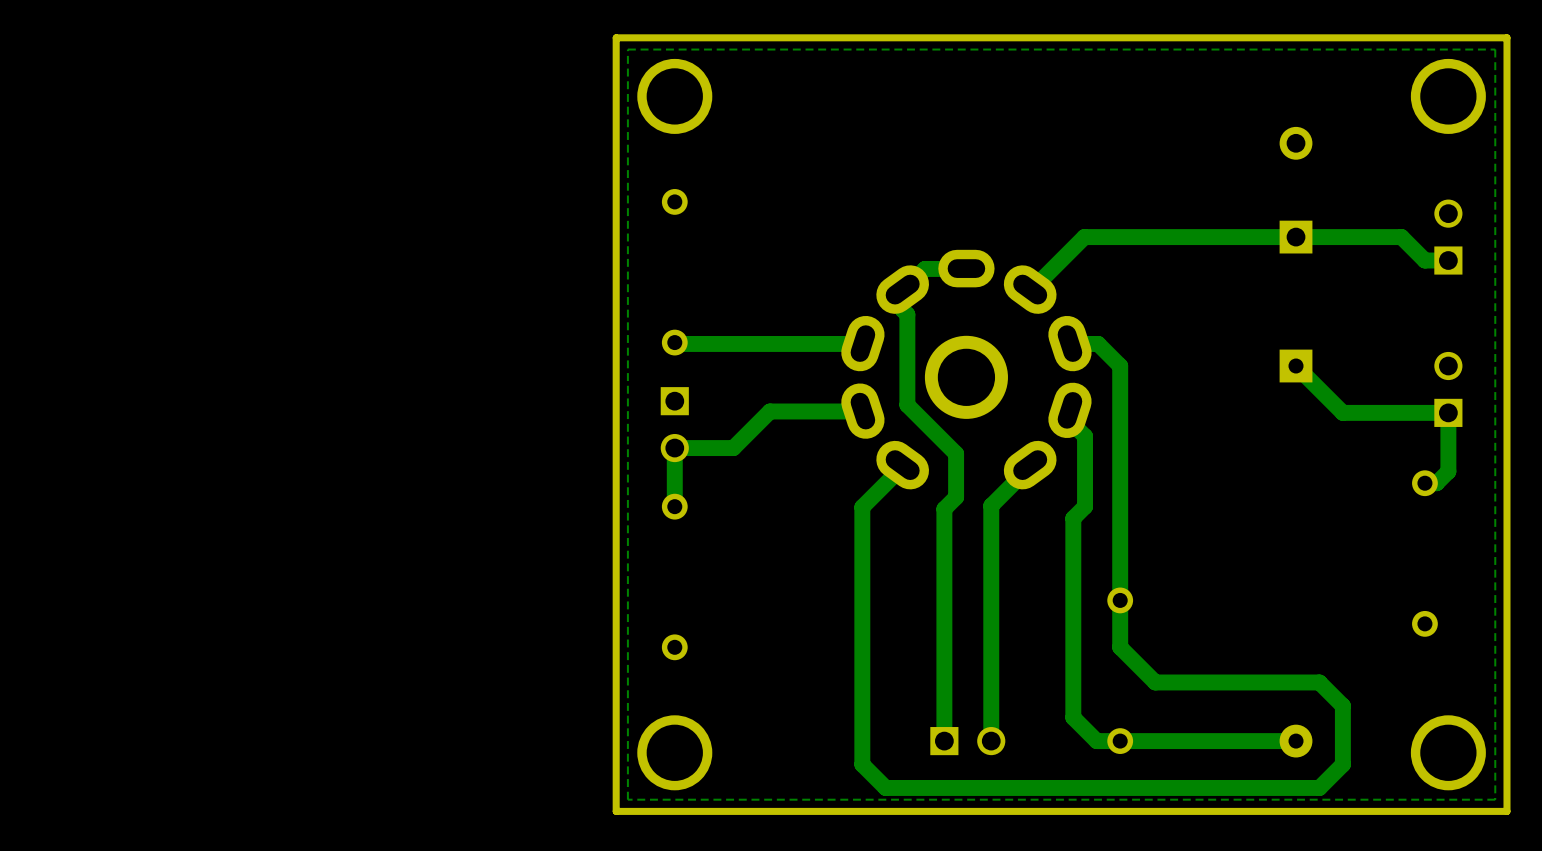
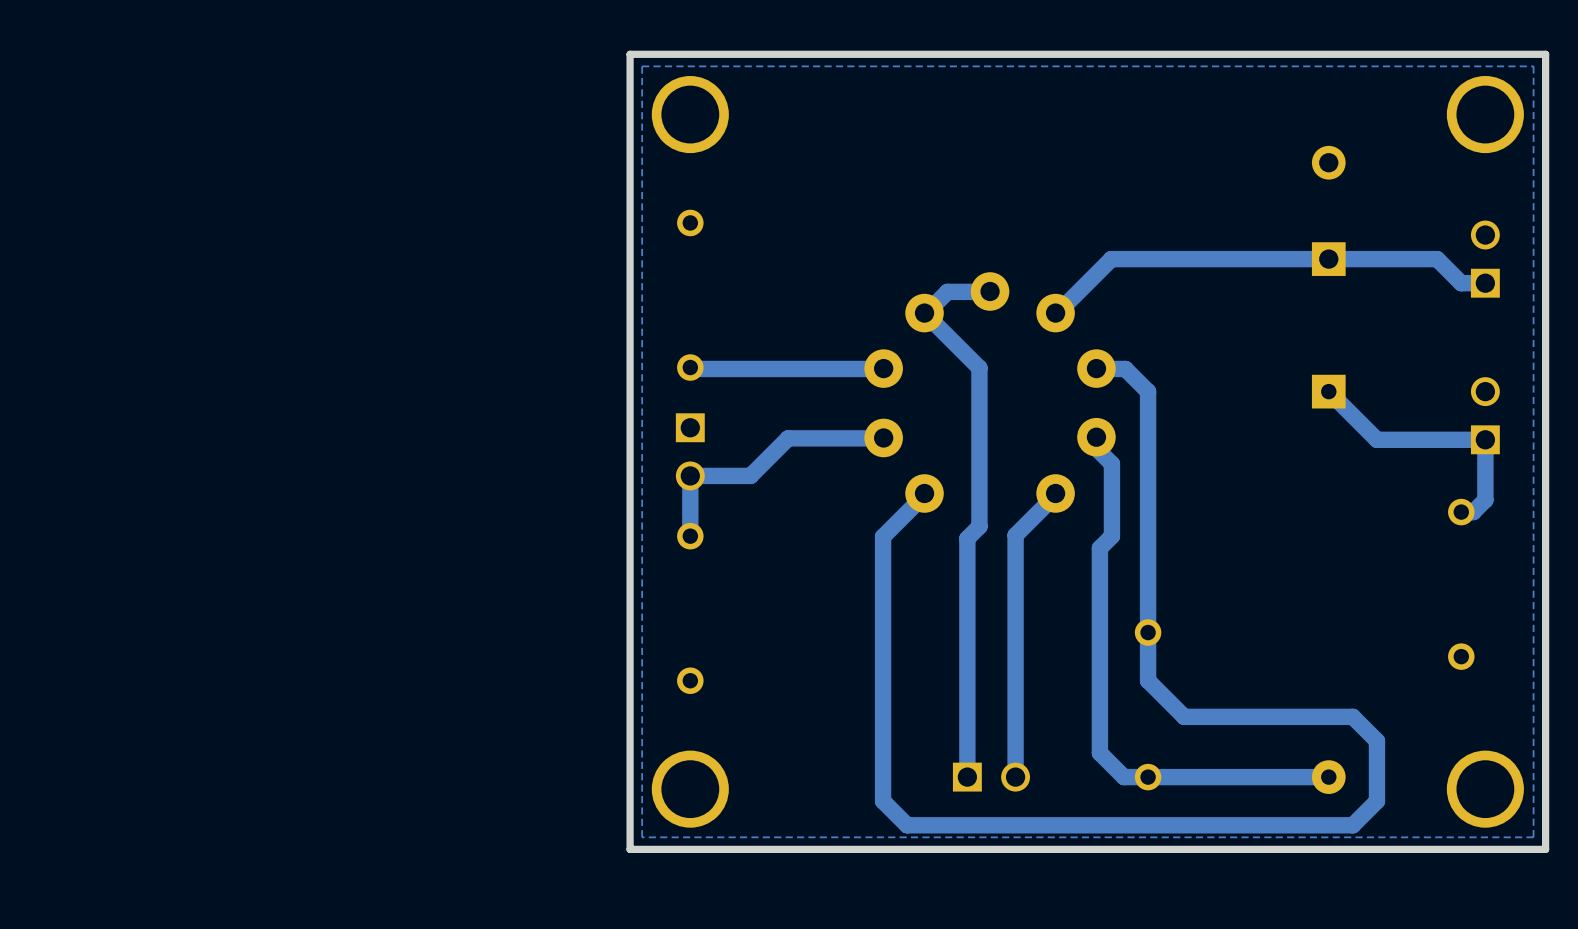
part footprint: [841, 249, 1092, 490] -> [864, 272, 1116, 513]
bottom track: (902, 289) (902, 309) (907, 314) (907, 405) (956, 453) -> (924, 313) (979, 367) (979, 481)

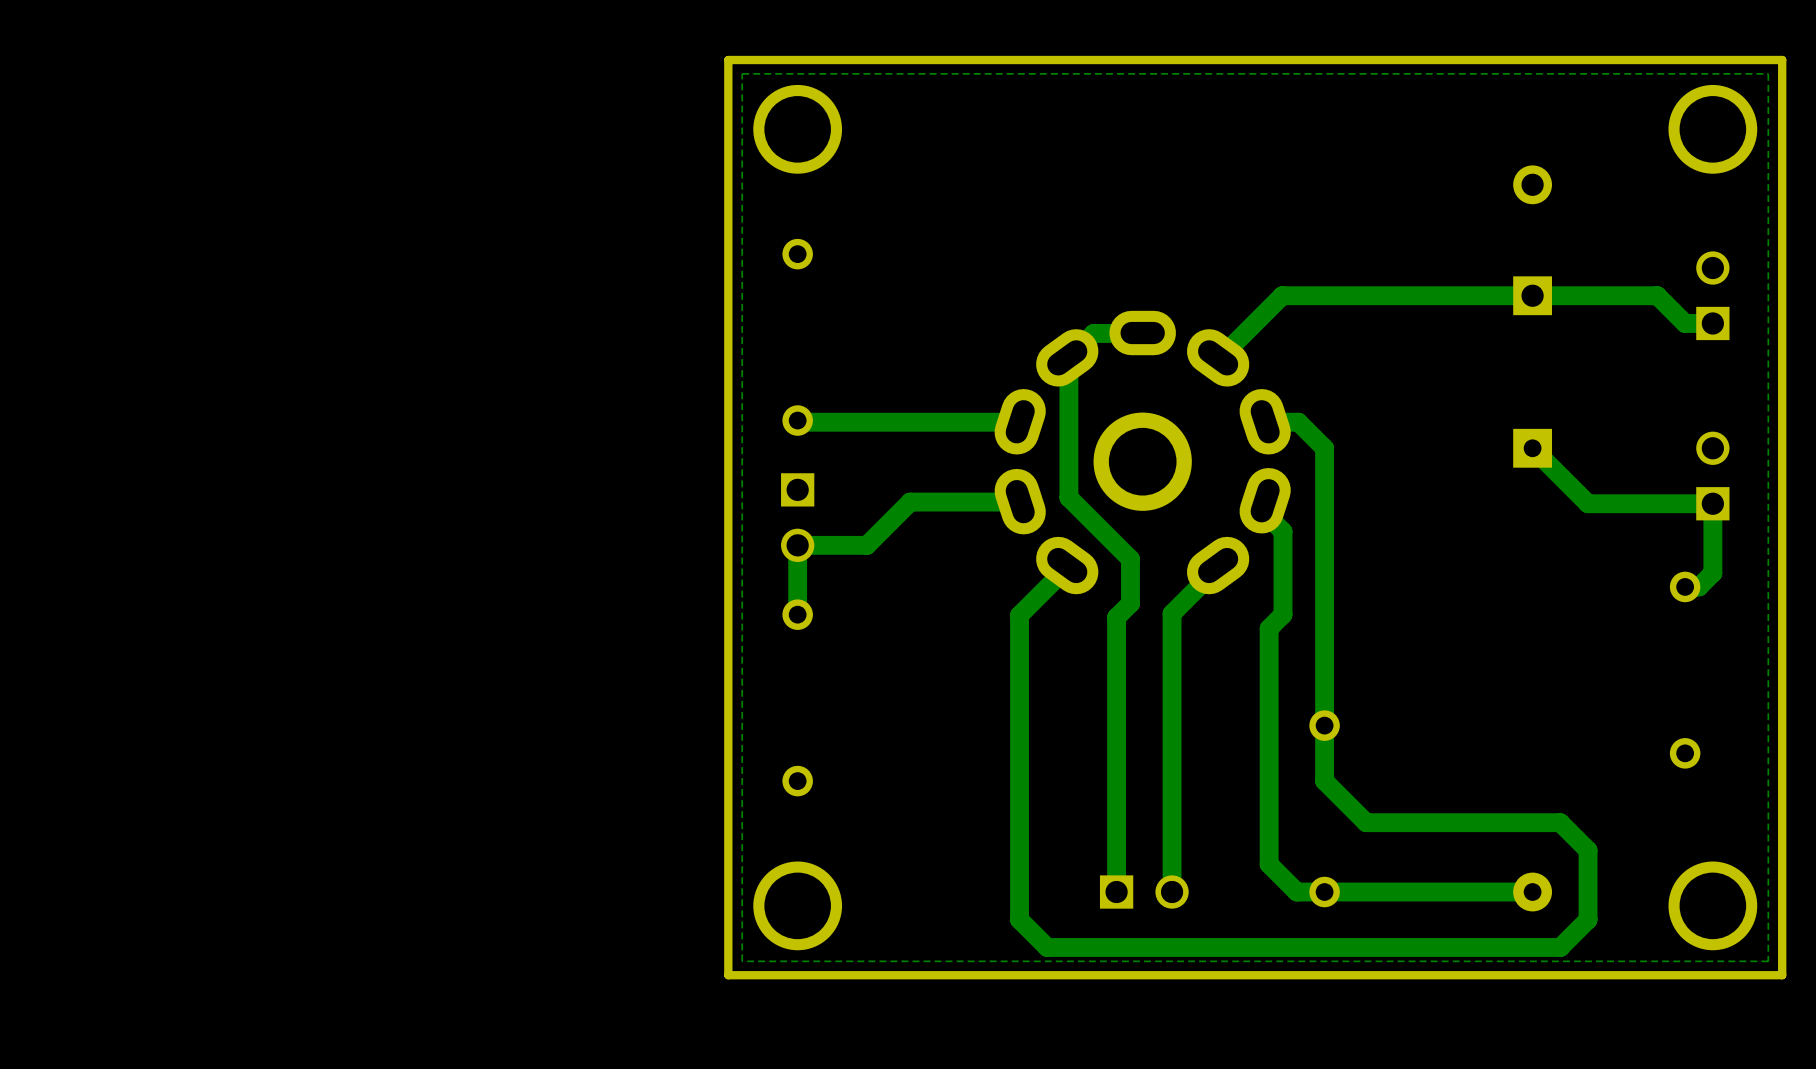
part footprint: [864, 272, 1116, 513] -> [994, 310, 1291, 595]
bottom track: (924, 313) (979, 367) (979, 487) -> (1068, 358) (1068, 497) (1130, 559)

